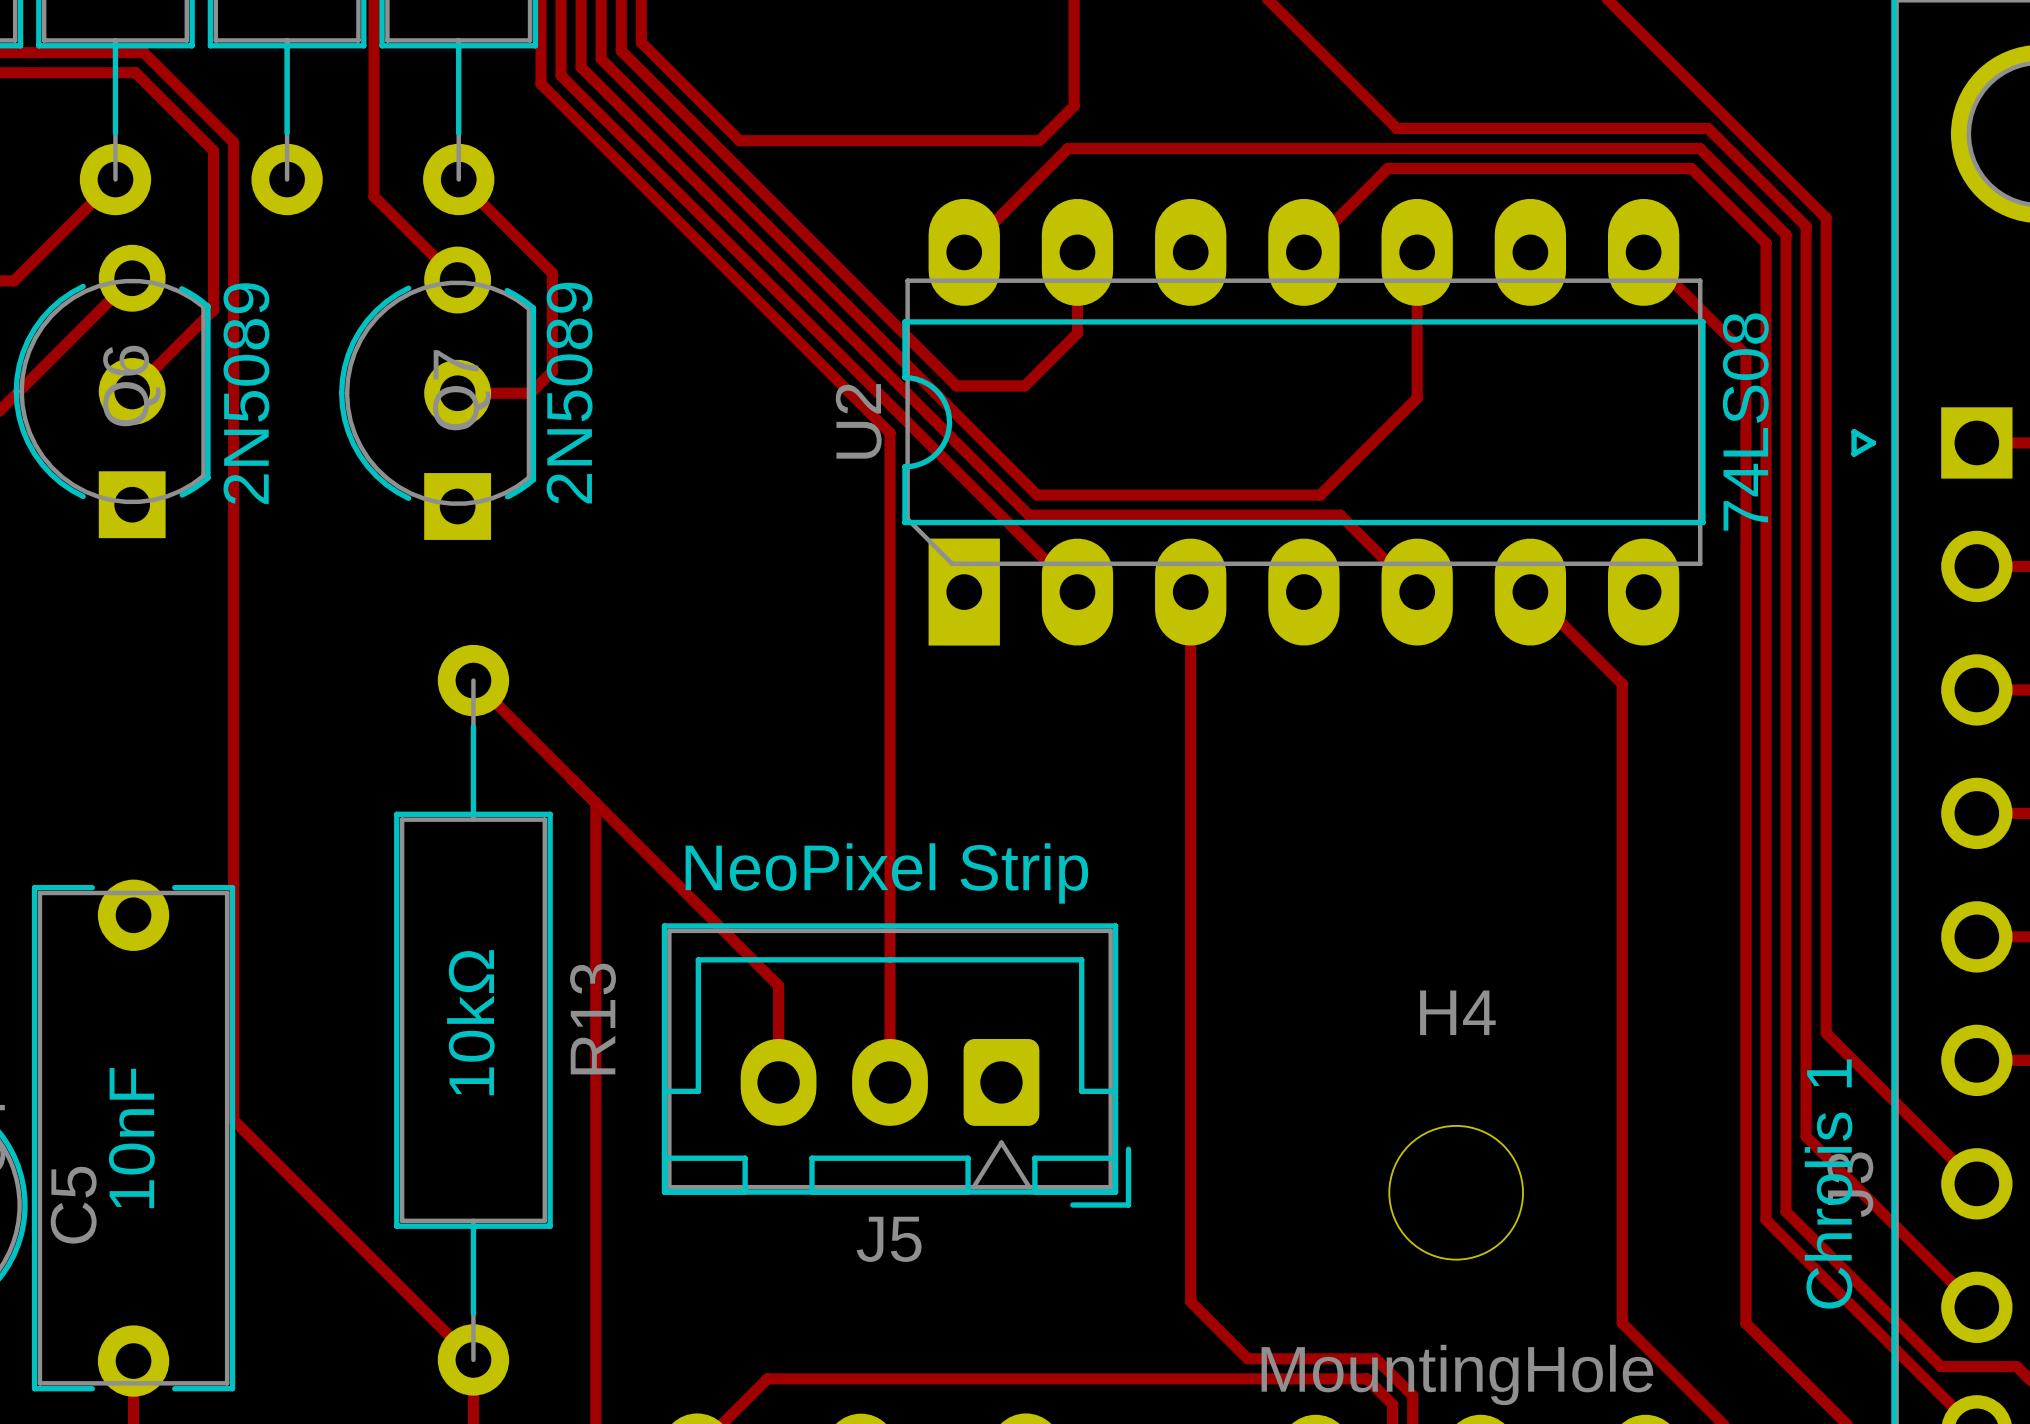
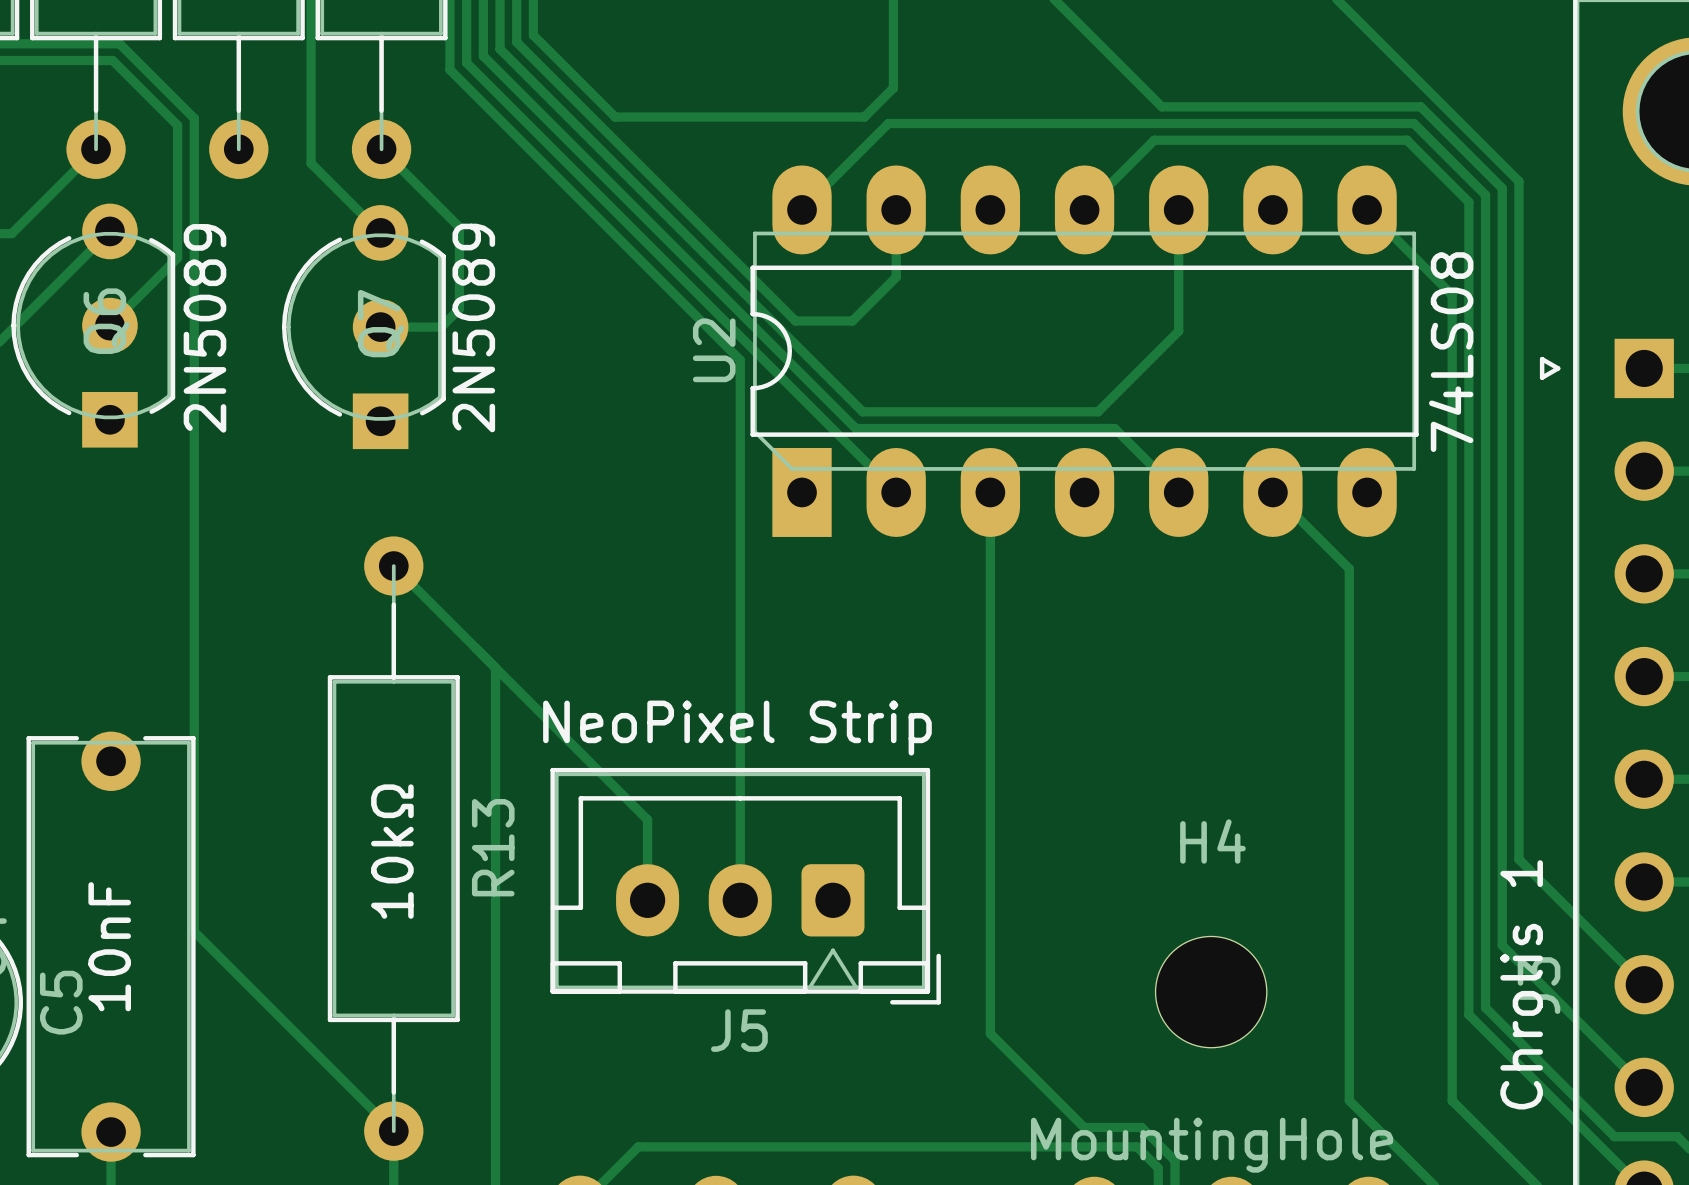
track: (1190, 1242) (1190, 1301) (1247, 1358) (1375, 1358) -> (990, 1033) (1084, 1127) (1141, 1127) (1144, 1130)

